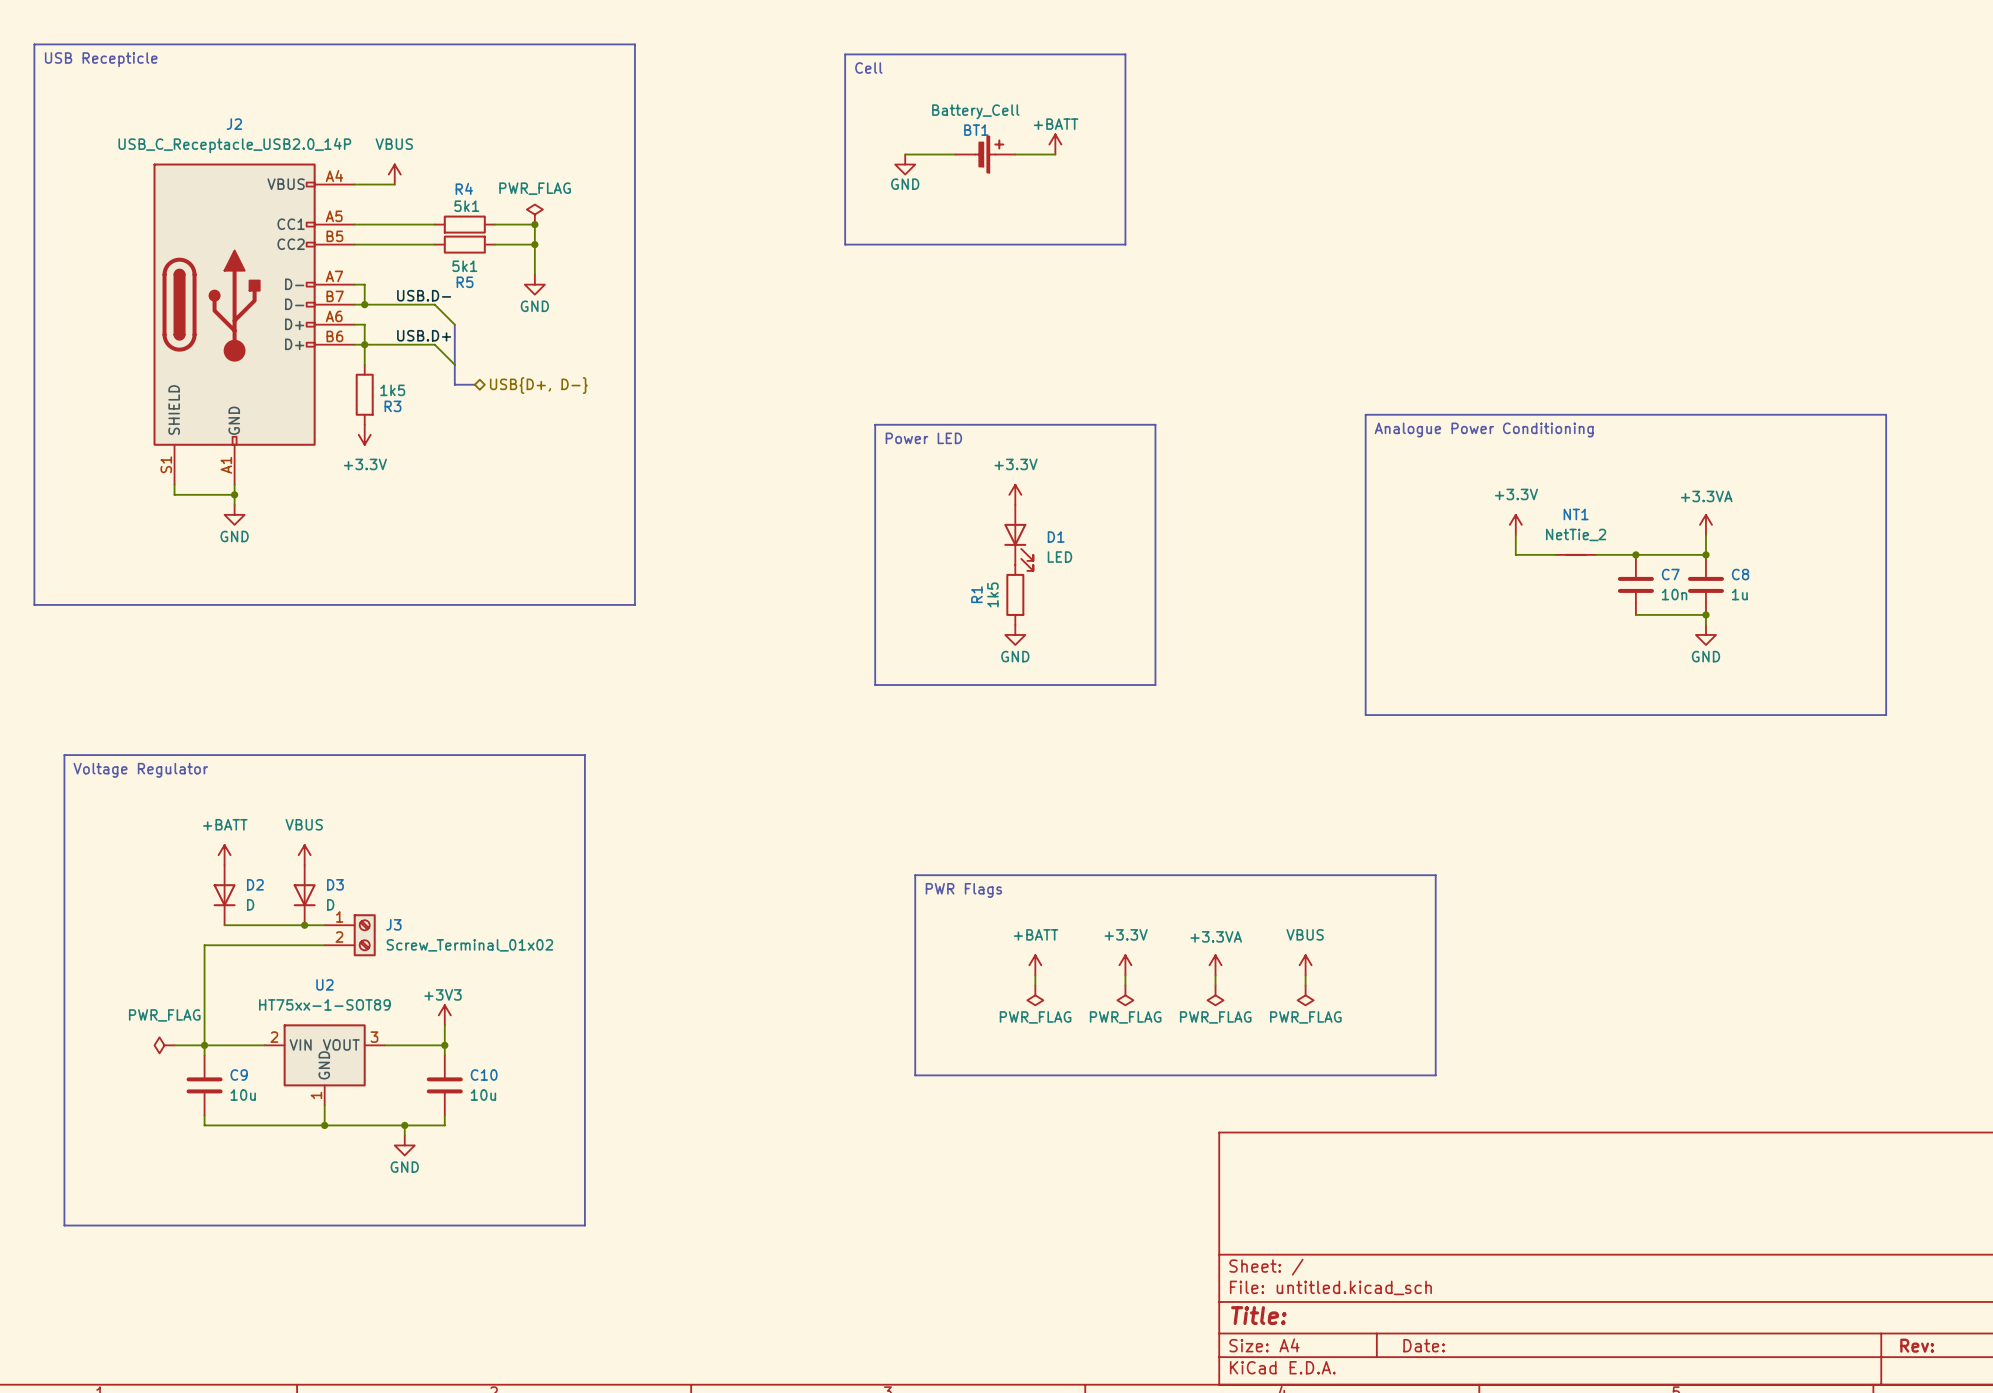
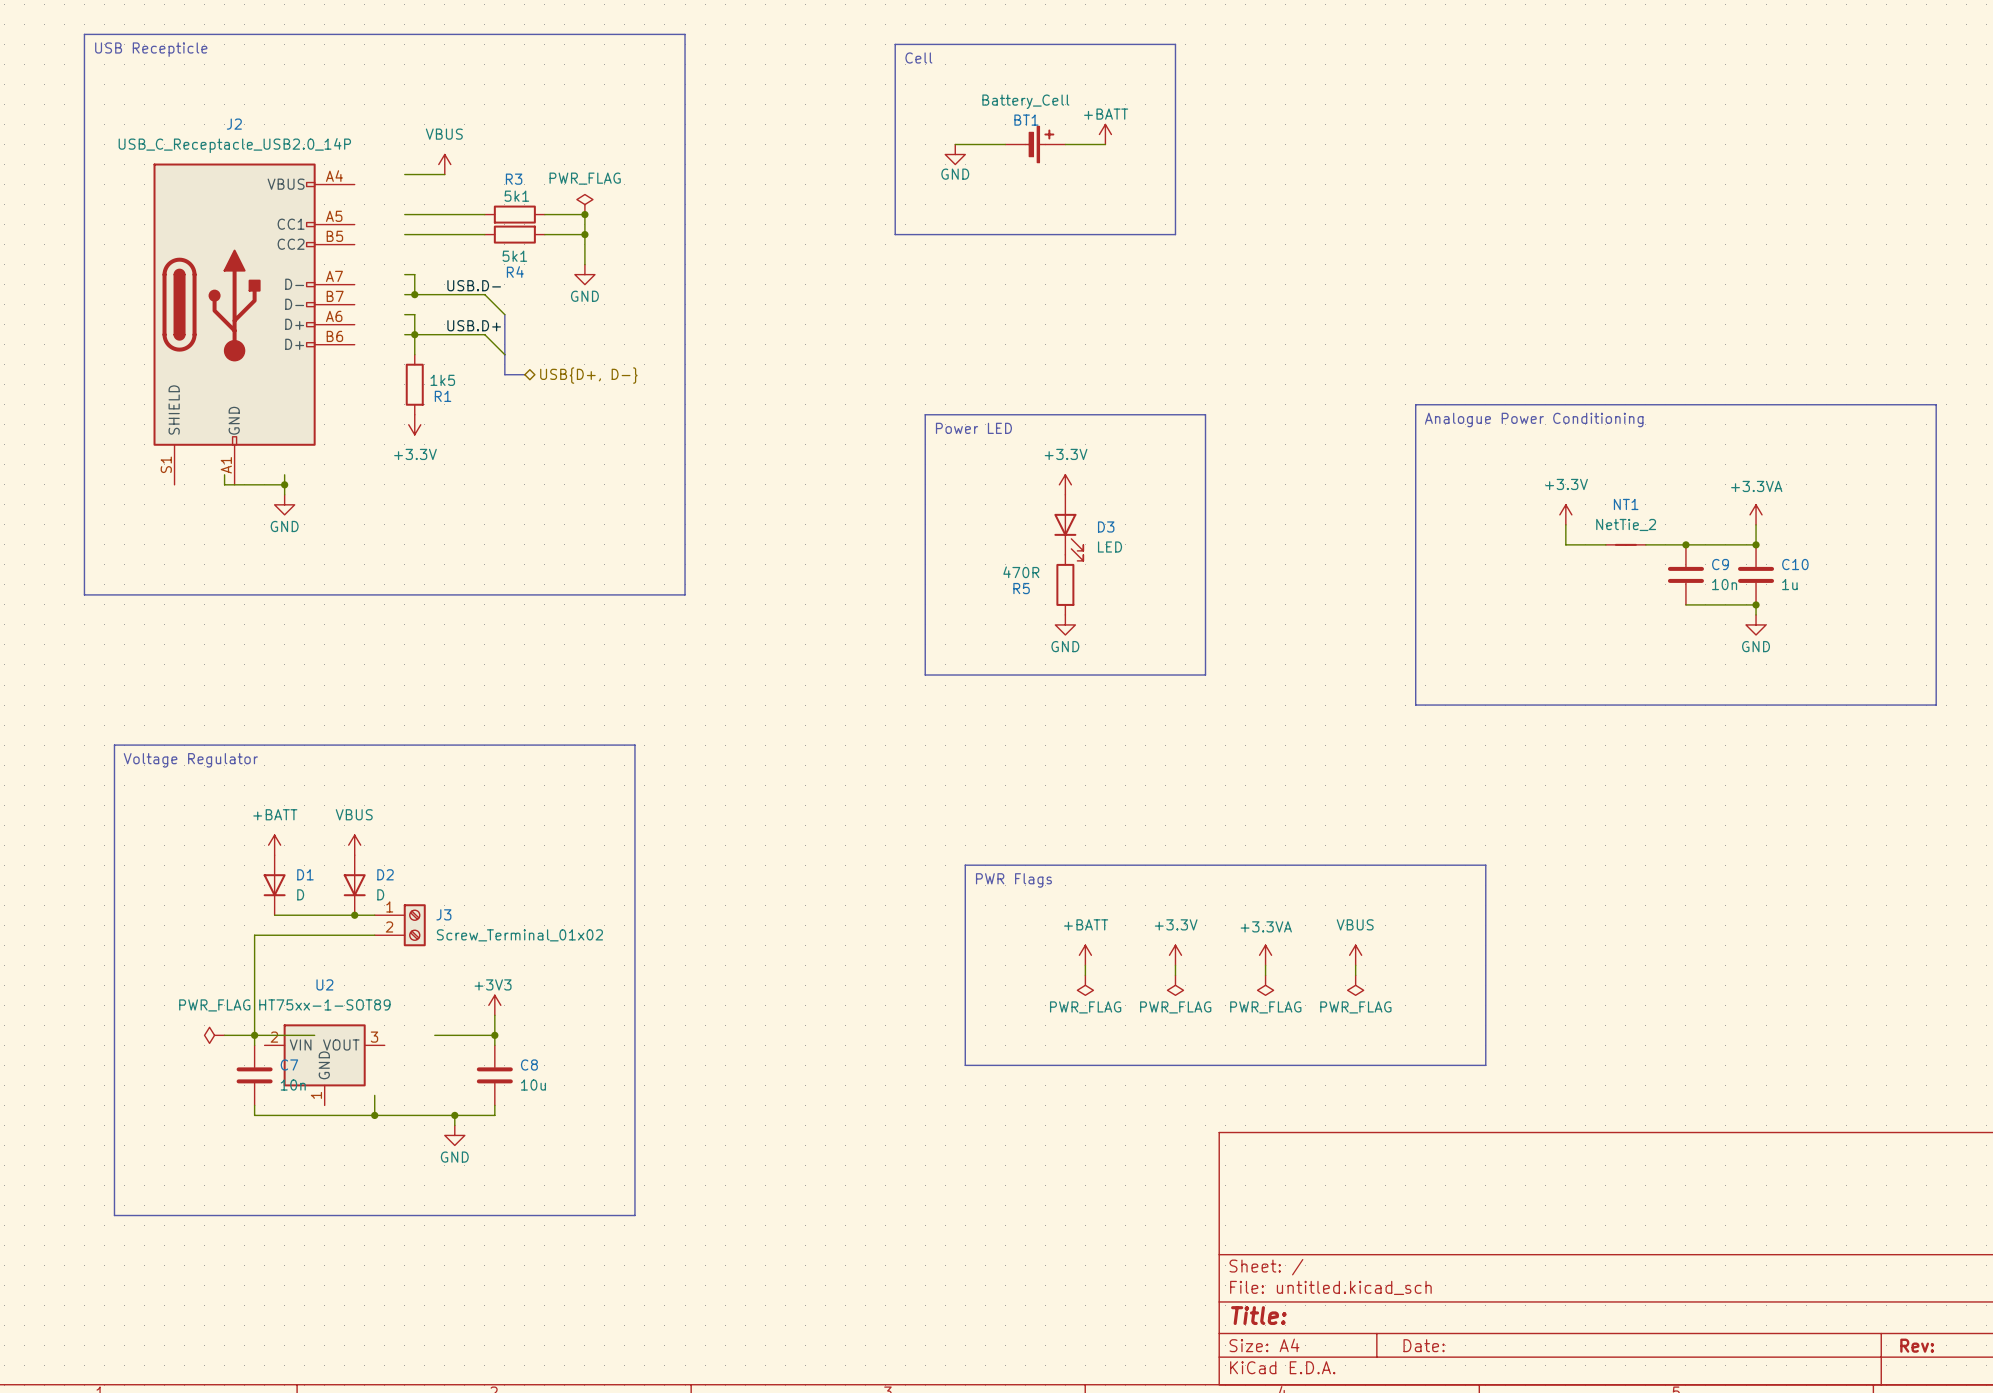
line: (34, 44) (634, 44) (634, 604) (34, 604) (34, 44) -> (84, 34) (685, 34) (685, 594) (84, 594) (84, 34)
line: (845, 54) (1125, 54) (1125, 244) (845, 244) (845, 54) -> (895, 44) (1175, 44) (1175, 234) (895, 234) (895, 44)
text position: USB Recepticle (101, 59) -> USB Recepticle (151, 49)
text position: Cell (868, 68) -> Cell (918, 58)
power symbol position: +BATT (1055, 144) -> +BATT (1105, 134)
wire: (905, 154) (955, 154) -> (955, 144) (1005, 144)
BT1 position: (985, 154) -> (1035, 144)
wire: (1015, 154) (1055, 154) -> (1065, 144) (1105, 144)
power symbol position: GND (905, 164) -> GND (955, 154)
power symbol position: VBUS (394, 174) -> VBUS (444, 164)
wire: (354, 184) (394, 184) -> (404, 174) (444, 174)
R4 name position: R4 (464, 188) -> R4 (515, 272)
R4 value position: 5k1 (466, 206) -> 5k1 (514, 256)
power symbol position: PWR_FLAG (534, 214) -> PWR_FLAG (584, 204)
junction: none -> (584, 214)
wire: (354, 224) (434, 224) -> (404, 214) (484, 214)
R4 position: (464, 224) -> (514, 234)
wire: (494, 224) (534, 224) (534, 274) -> (544, 214) (584, 214) (584, 264)
junction: (534, 224) -> none
junction: none -> (584, 234)
wire: (354, 244) (434, 244) -> (404, 234) (484, 234)
R5 rotation: 0° (464, 244) -> 90° clockwise (1065, 584)
R5 position: (464, 244) -> (1065, 584)
wire: (494, 244) (534, 244) -> (544, 234) (584, 234)
junction: (534, 244) -> none
R5 value: 5k1 (464, 266) -> 470R (1021, 572)
wire: (354, 284) (364, 284) (364, 304) -> (404, 274) (414, 274) (414, 294)
power symbol position: GND (534, 284) -> GND (584, 274)
junction: none -> (414, 294)
label position: USB.D- (424, 295) -> USB.D- (474, 285)
wire: (354, 304) (434, 304) (454, 324) -> (404, 294) (484, 294) (504, 314)
junction: (364, 304) -> none
wire: (354, 324) (364, 324) (364, 364) -> (404, 314) (414, 314) (414, 354)
bus: (454, 324) (454, 384) (474, 384) -> (504, 314) (504, 374) (524, 374)
junction: none -> (414, 334)
label position: USB.D+ (424, 335) -> USB.D+ (474, 325)
wire: (354, 344) (434, 344) (454, 364) -> (404, 334) (484, 334) (504, 354)
junction: (364, 344) -> none
hierarchical label position: USB{D+, D-} (538, 385) -> USB{D+, D-} (588, 375)
R3 value: 1k5 (392, 390) -> 5k1 (516, 196)
R3 rotation: 0° (364, 394) -> 90° clockwise (514, 214)
R3 position: (364, 394) -> (514, 214)
R3 name position: R3 (392, 406) -> R3 (514, 179)
line: (1365, 414) (1886, 414) (1886, 715) (1365, 715) (1365, 414) -> (1415, 404) (1936, 404) (1936, 705) (1415, 705) (1415, 404)
line: (875, 424) (1155, 424) (1155, 685) (875, 685) (875, 424) -> (925, 414) (1205, 414) (1205, 675) (925, 675) (925, 414)
text position: Analogue Power Conditioning (1484, 430) -> Analogue Power Conditioning (1534, 420)
power symbol position: +3.3V (364, 434) -> +3.3V (414, 424)
text position: Power LED (923, 438) -> Power LED (973, 428)
wire: (174, 484) (174, 494) (234, 494) -> (224, 474) (224, 484) (284, 484)
wire: (234, 484) (234, 504) -> (284, 474) (284, 494)
junction: none -> (284, 484)
junction: (234, 494) -> none
power symbol position: +3.3V (1015, 494) -> +3.3V (1065, 484)
D1 symbol: [1004, 504, 1034, 571] -> [263, 855, 286, 916]
power symbol position: GND (234, 514) -> GND (284, 504)
power symbol position: +3.3V (1515, 524) -> +3.3V (1565, 514)
power symbol position: +3.3VA (1705, 524) -> +3.3VA (1756, 514)
wire: (1515, 534) (1515, 554) (1555, 554) -> (1565, 524) (1565, 544) (1605, 544)
wire: (1705, 534) (1705, 554) (1595, 554) -> (1756, 524) (1756, 544) (1645, 544)
junction: none -> (1756, 544)
NT1 position: (1575, 554) -> (1625, 544)
junction: (1635, 554) -> none
junction position: (1705, 554) -> (1685, 544)
D1 value: LED (1059, 557) -> D (300, 894)
C7 position: (1635, 584) -> (254, 1075)
C8 position: (1705, 584) -> (494, 1075)
R1 name rotation: 0° (976, 594) -> 90° clockwise (443, 396)
R1 name position: R1 (976, 594) -> R1 (443, 396)
R1 value rotation: 0° (992, 594) -> 90° clockwise (442, 380)
R1 value position: 1k5 (992, 594) -> 1k5 (442, 380)
R1 position: (1015, 594) -> (414, 384)
C8 value: 1u (1739, 594) -> 10u (533, 1085)
junction: none -> (1756, 604)
wire: (1635, 614) (1705, 614) (1705, 624) -> (1685, 604) (1756, 604) (1756, 614)
junction: (1705, 614) -> none
power symbol position: GND (1015, 634) -> GND (1065, 624)
power symbol position: GND (1705, 634) -> GND (1756, 624)
line: (64, 755) (584, 755) (584, 1225) (64, 1225) (64, 755) -> (114, 745) (634, 745) (634, 1215) (114, 1215) (114, 745)
text position: Voltage Regulator (140, 770) -> Voltage Regulator (190, 760)
power symbol position: +BATT (224, 855) -> +BATT (274, 845)
power symbol position: VBUS (304, 855) -> VBUS (354, 845)
D3 symbol: [293, 865, 316, 926] -> [1054, 494, 1084, 561]
line: (915, 875) (1435, 875) (1435, 1075) (915, 1075) (915, 875) -> (965, 865) (1485, 865) (1485, 1065) (965, 1065) (965, 865)
text position: PWR Flags (963, 890) -> PWR Flags (1013, 880)
D2 position: (224, 895) -> (354, 885)
D3 value: D (330, 904) -> LED (1110, 547)
junction: none -> (354, 915)
wire: (224, 925) (324, 925) -> (274, 915) (374, 915)
junction: (304, 925) -> none
J3 position: (350, 935) -> (400, 925)
wire: (324, 945) (204, 945) (204, 1055) -> (374, 935) (254, 935) (254, 1045)
power symbol position: +BATT (1035, 965) -> +BATT (1085, 955)
power symbol position: +3.3V (1125, 965) -> +3.3V (1175, 955)
power symbol position: +3.3VA (1215, 965) -> +3.3VA (1265, 955)
power symbol position: VBUS (1305, 965) -> VBUS (1355, 955)
wire: (1035, 975) (1035, 985) -> (1085, 965) (1085, 975)
wire: (1125, 975) (1125, 985) -> (1175, 965) (1175, 975)
wire: (1215, 975) (1215, 985) -> (1265, 965) (1265, 975)
wire: (1305, 975) (1305, 985) -> (1355, 965) (1355, 975)
power symbol: none -> PWR_FLAG (1085, 985)
power symbol: none -> PWR_FLAG (1175, 985)
power symbol: none -> PWR_FLAG (1265, 985)
power symbol: none -> PWR_FLAG (1355, 985)
power symbol: PWR_FLAG (1035, 995) -> none
power symbol: PWR_FLAG (1125, 995) -> none
power symbol: PWR_FLAG (1215, 995) -> none
power symbol: PWR_FLAG (1305, 995) -> none
power symbol position: +3V3 (444, 1015) -> +3V3 (494, 1005)
wire: (444, 1025) (444, 1055) -> (494, 1015) (494, 1045)
junction: none -> (254, 1035)
junction: none -> (494, 1035)
power symbol position: PWR_FLAG (164, 1045) -> PWR_FLAG (214, 1035)
wire: (174, 1045) (264, 1045) -> (224, 1035) (314, 1035)
junction: (204, 1045) -> none
wire: (384, 1045) (444, 1045) -> (434, 1035) (494, 1035)
junction: (444, 1045) -> none
C9 position: (204, 1085) -> (1685, 574)
C10 position: (444, 1085) -> (1756, 574)
C9 value: 10u (243, 1095) -> 10n (1724, 584)
C10 value: 10u (483, 1095) -> 1u (1789, 584)
wire: (324, 1105) (324, 1125) -> (374, 1095) (374, 1115)
wire: (204, 1115) (204, 1125) (444, 1125) (444, 1115) -> (254, 1105) (254, 1115) (494, 1115) (494, 1105)
junction: none -> (374, 1115)
junction: none -> (454, 1115)
junction: (324, 1125) -> none
wire: (404, 1125) (404, 1135) -> (454, 1115) (454, 1125)
junction: (404, 1125) -> none
power symbol position: GND (404, 1145) -> GND (454, 1135)

